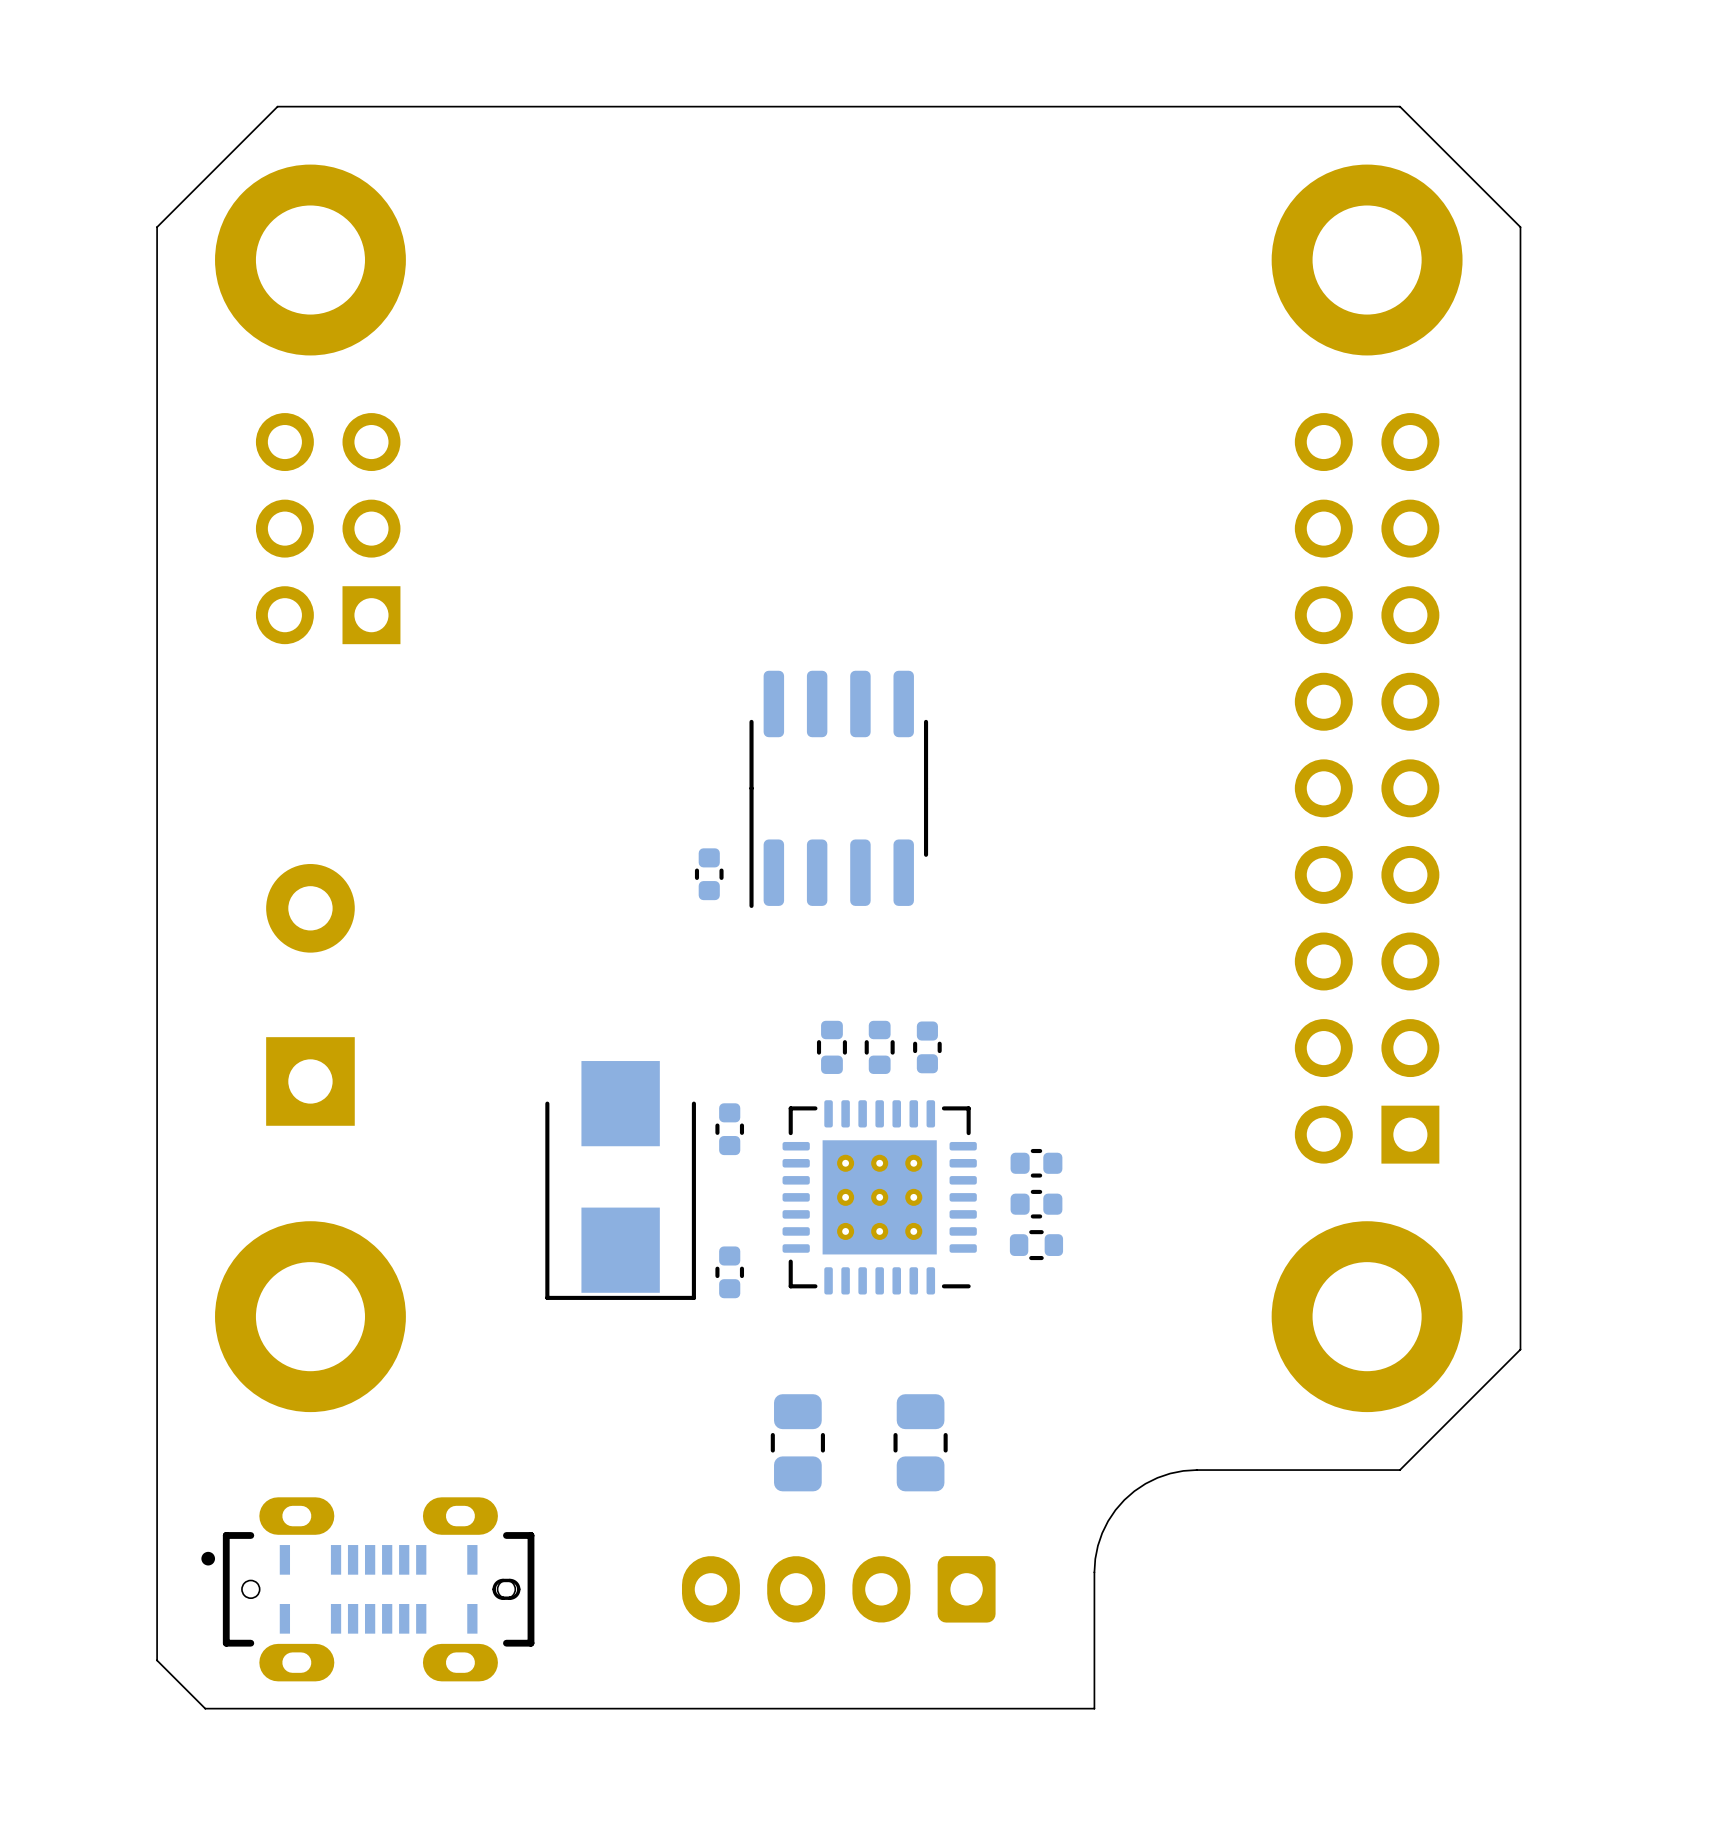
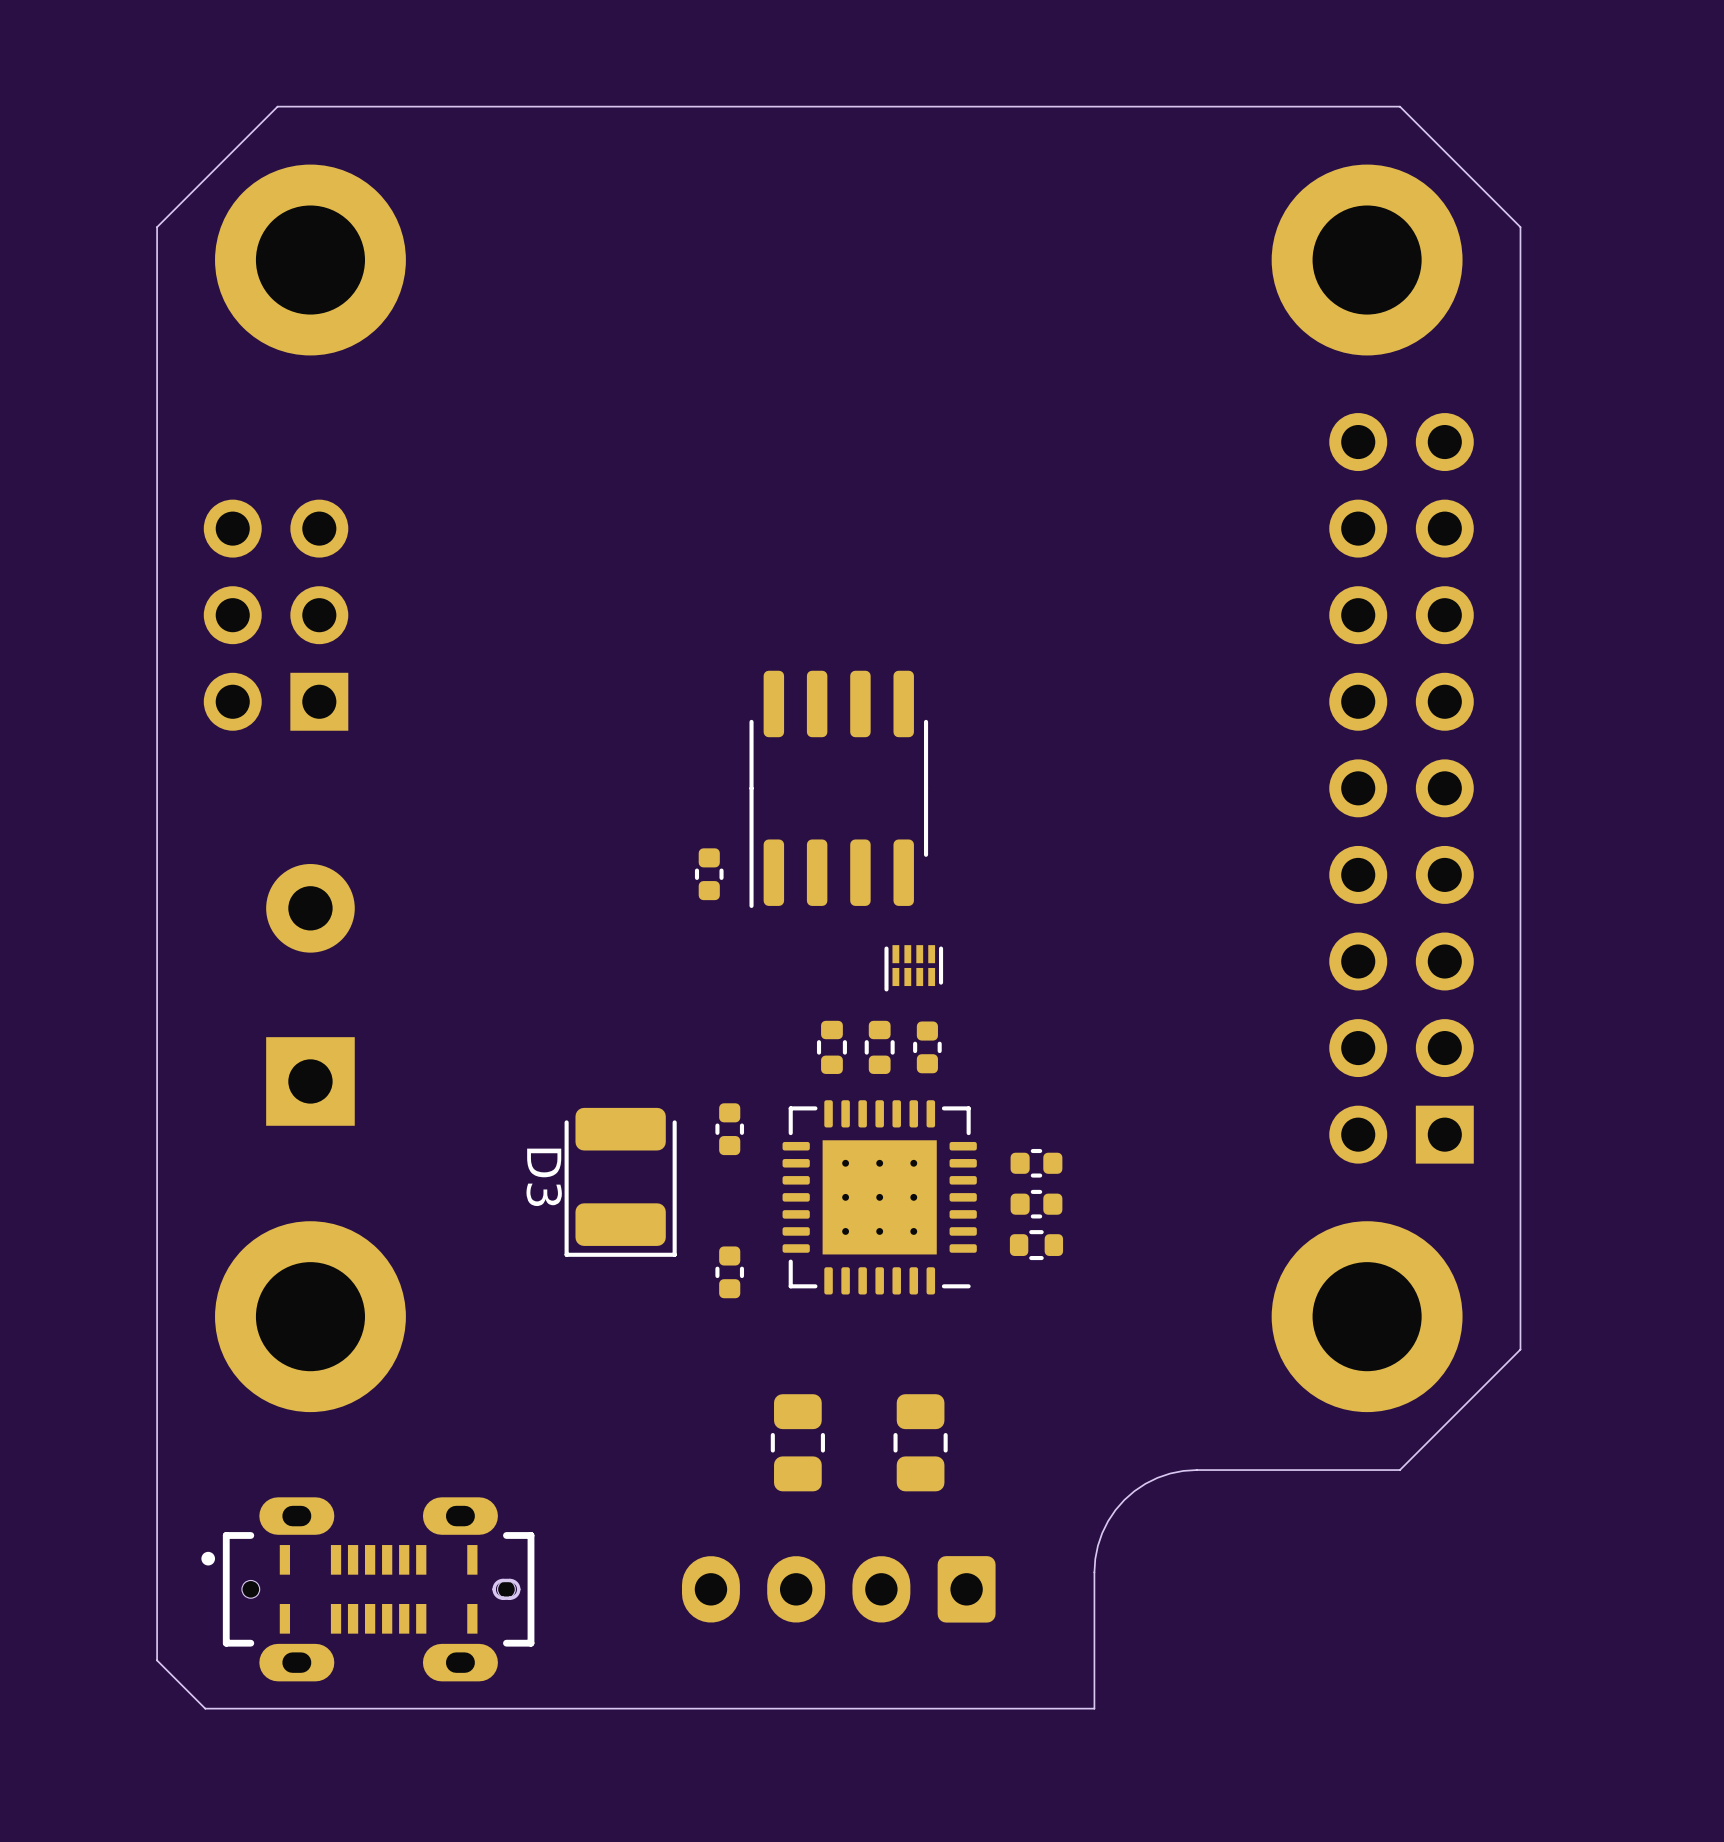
part position: (328, 528) -> (276, 615)
part position: (1367, 788) -> (1401, 788)
part: none -> (913, 968)
part: (620, 1180) -> none
D3: none -> (620, 1182)

